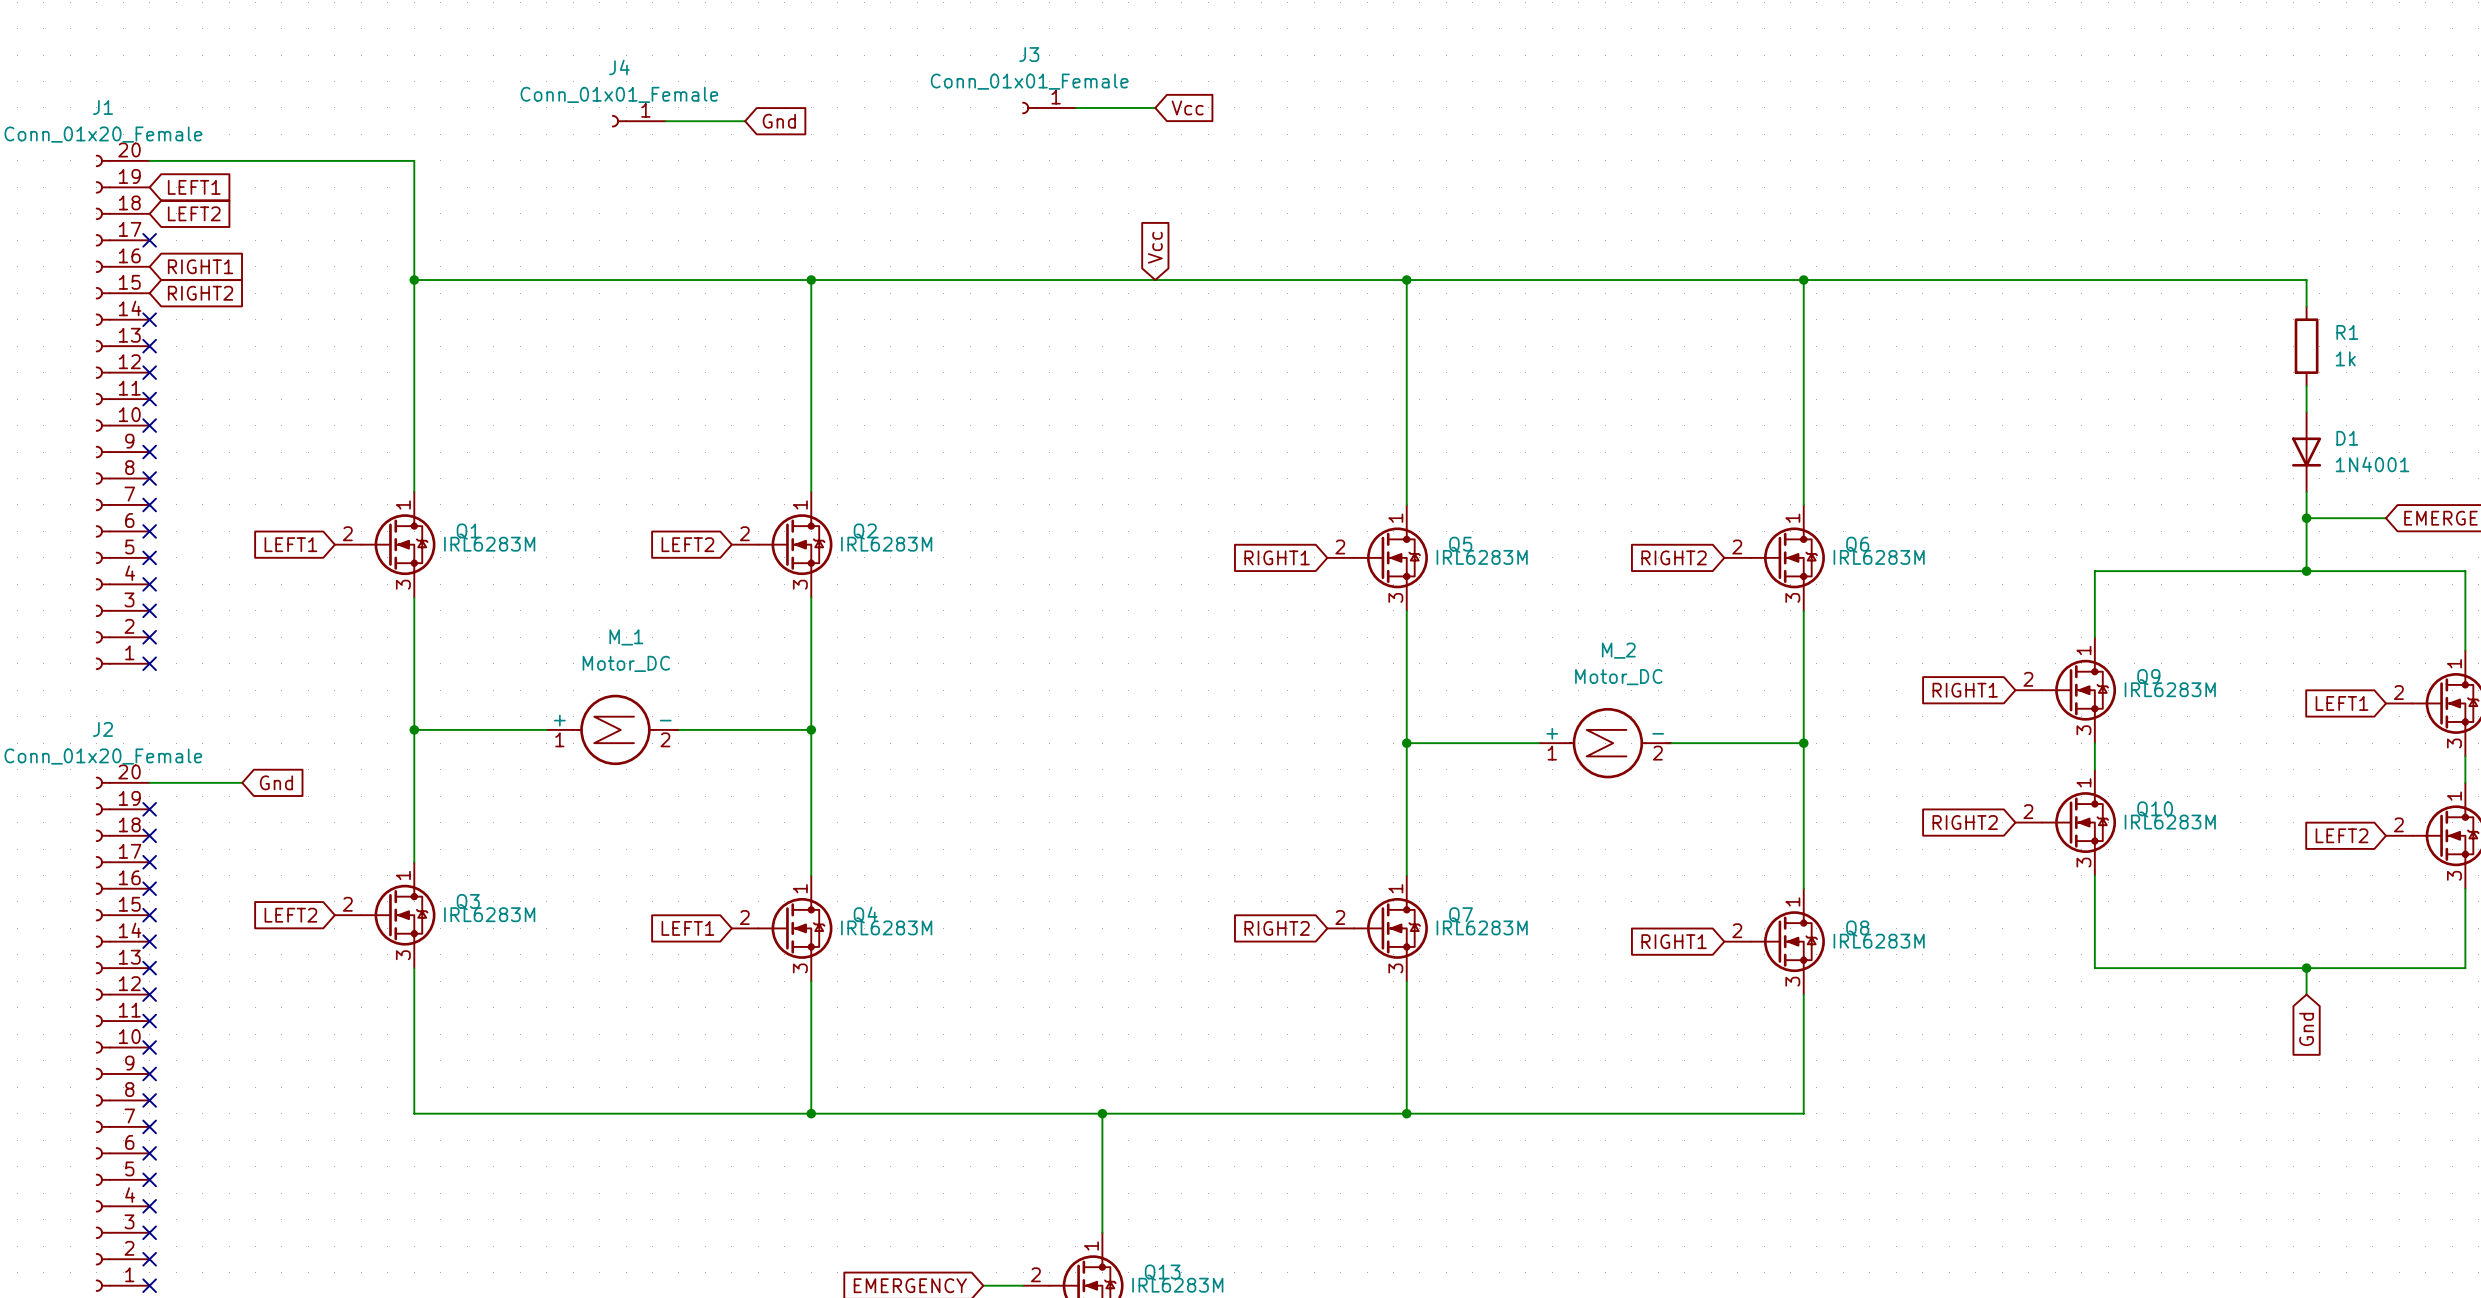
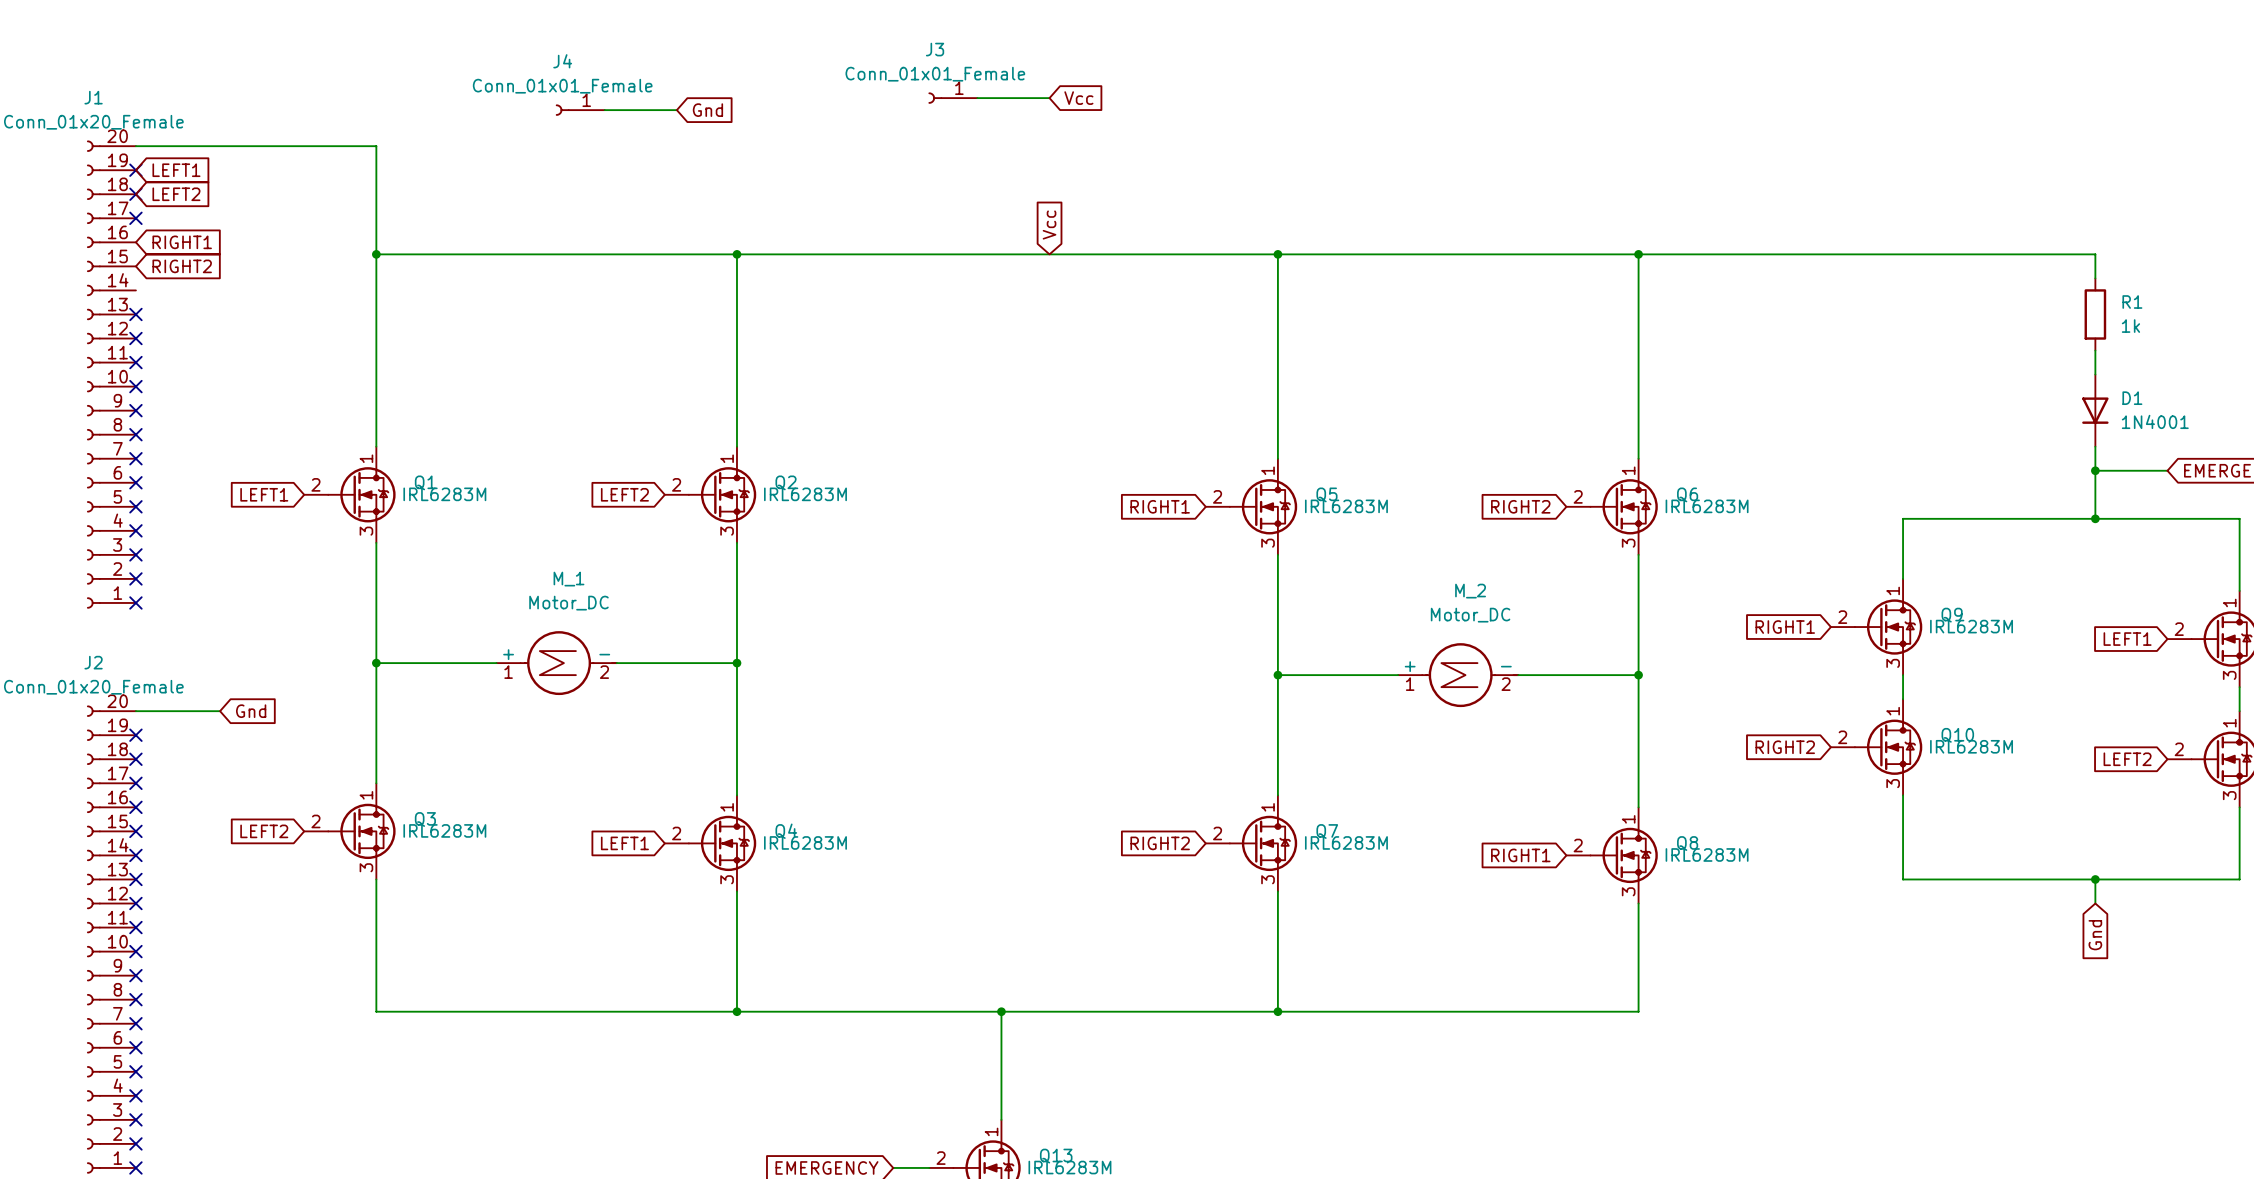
no-connect mark: none -> (135, 170)
no-connect mark: none -> (135, 194)
no-connect mark: (149, 319) -> none

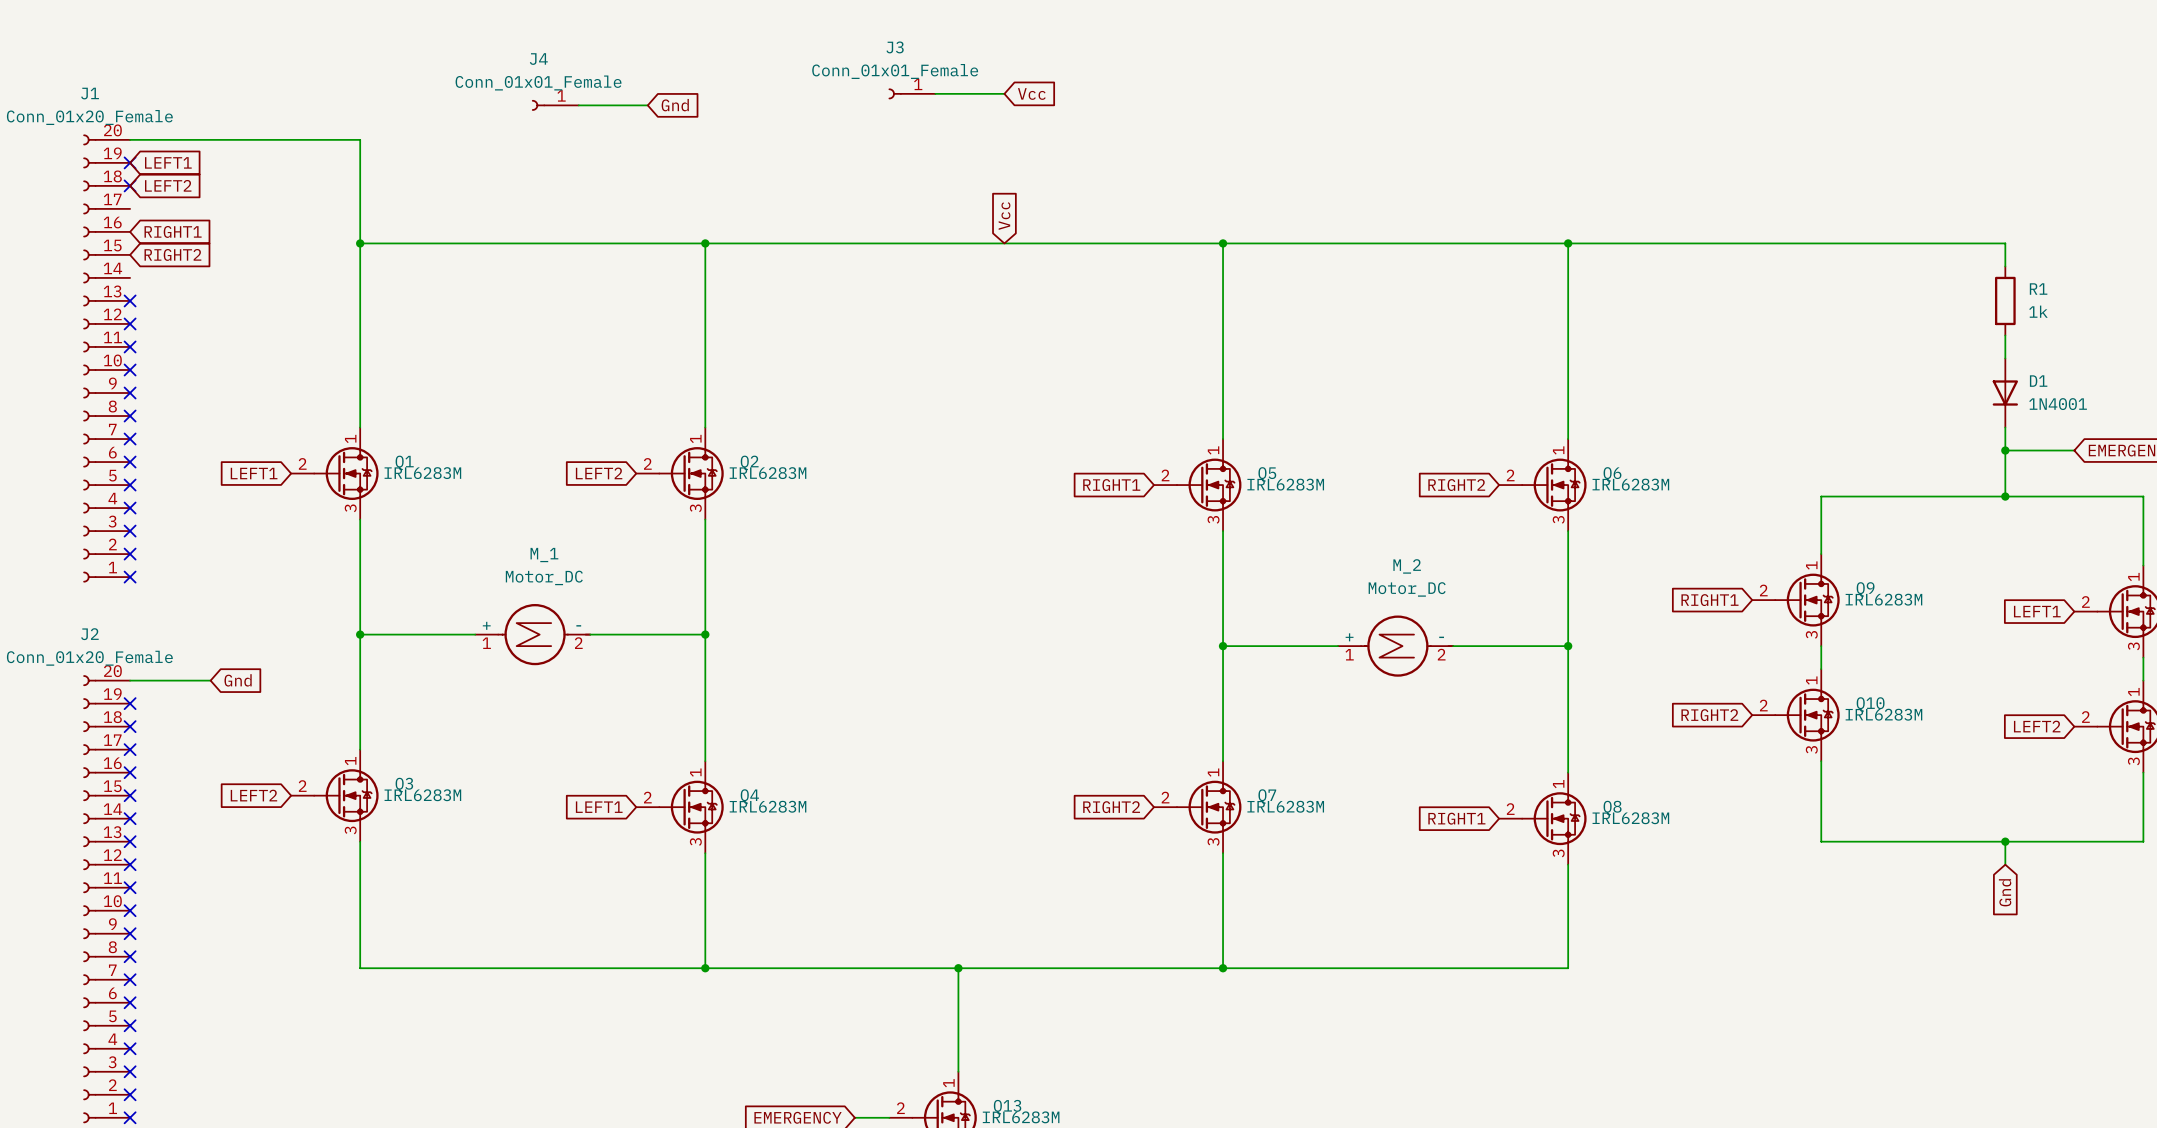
no-connect mark: (135, 218) -> none

